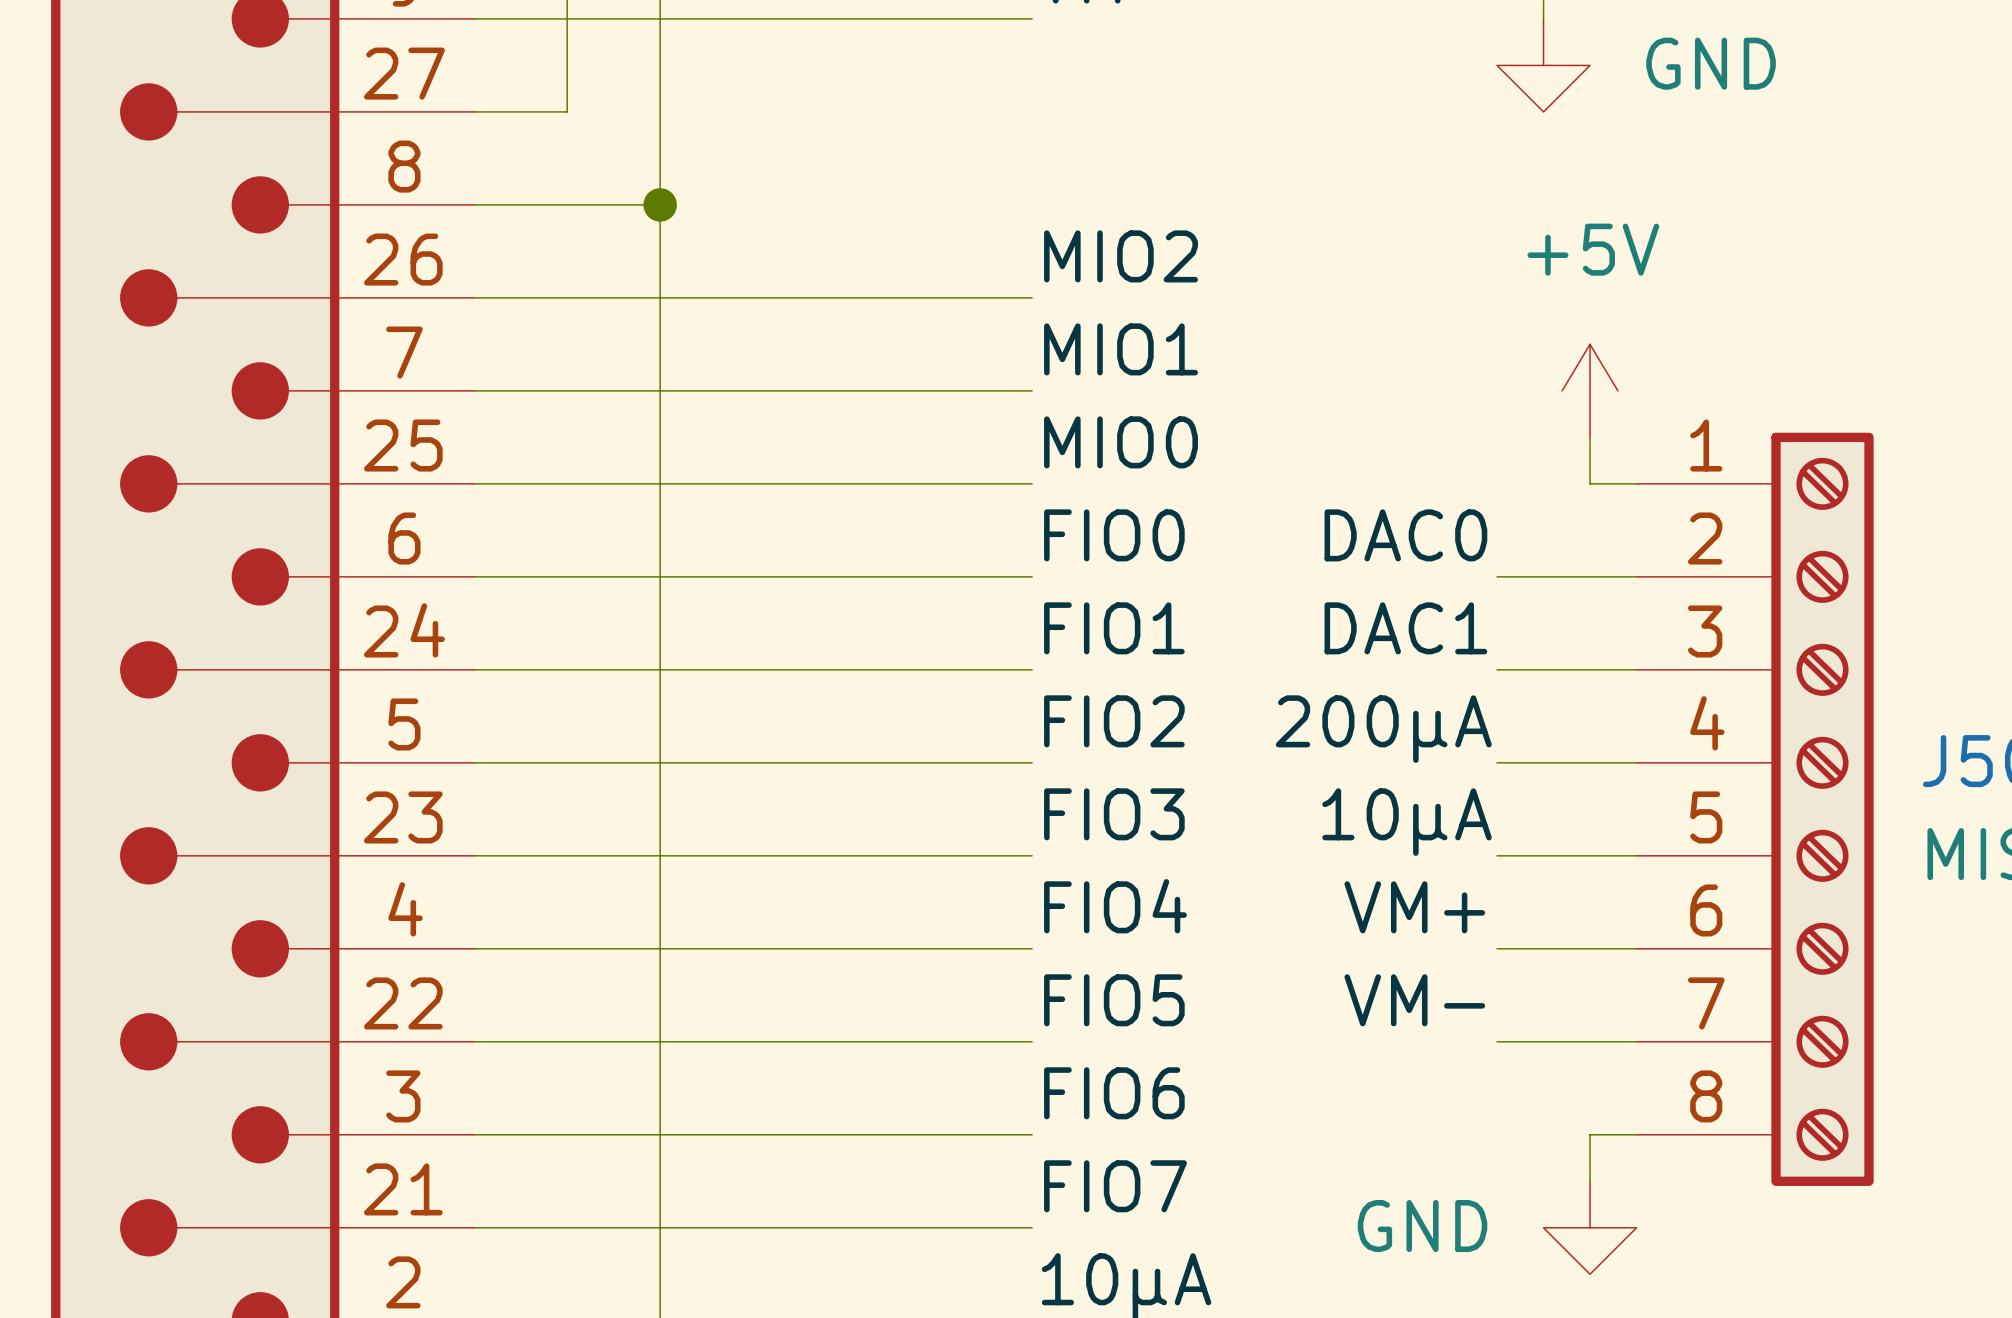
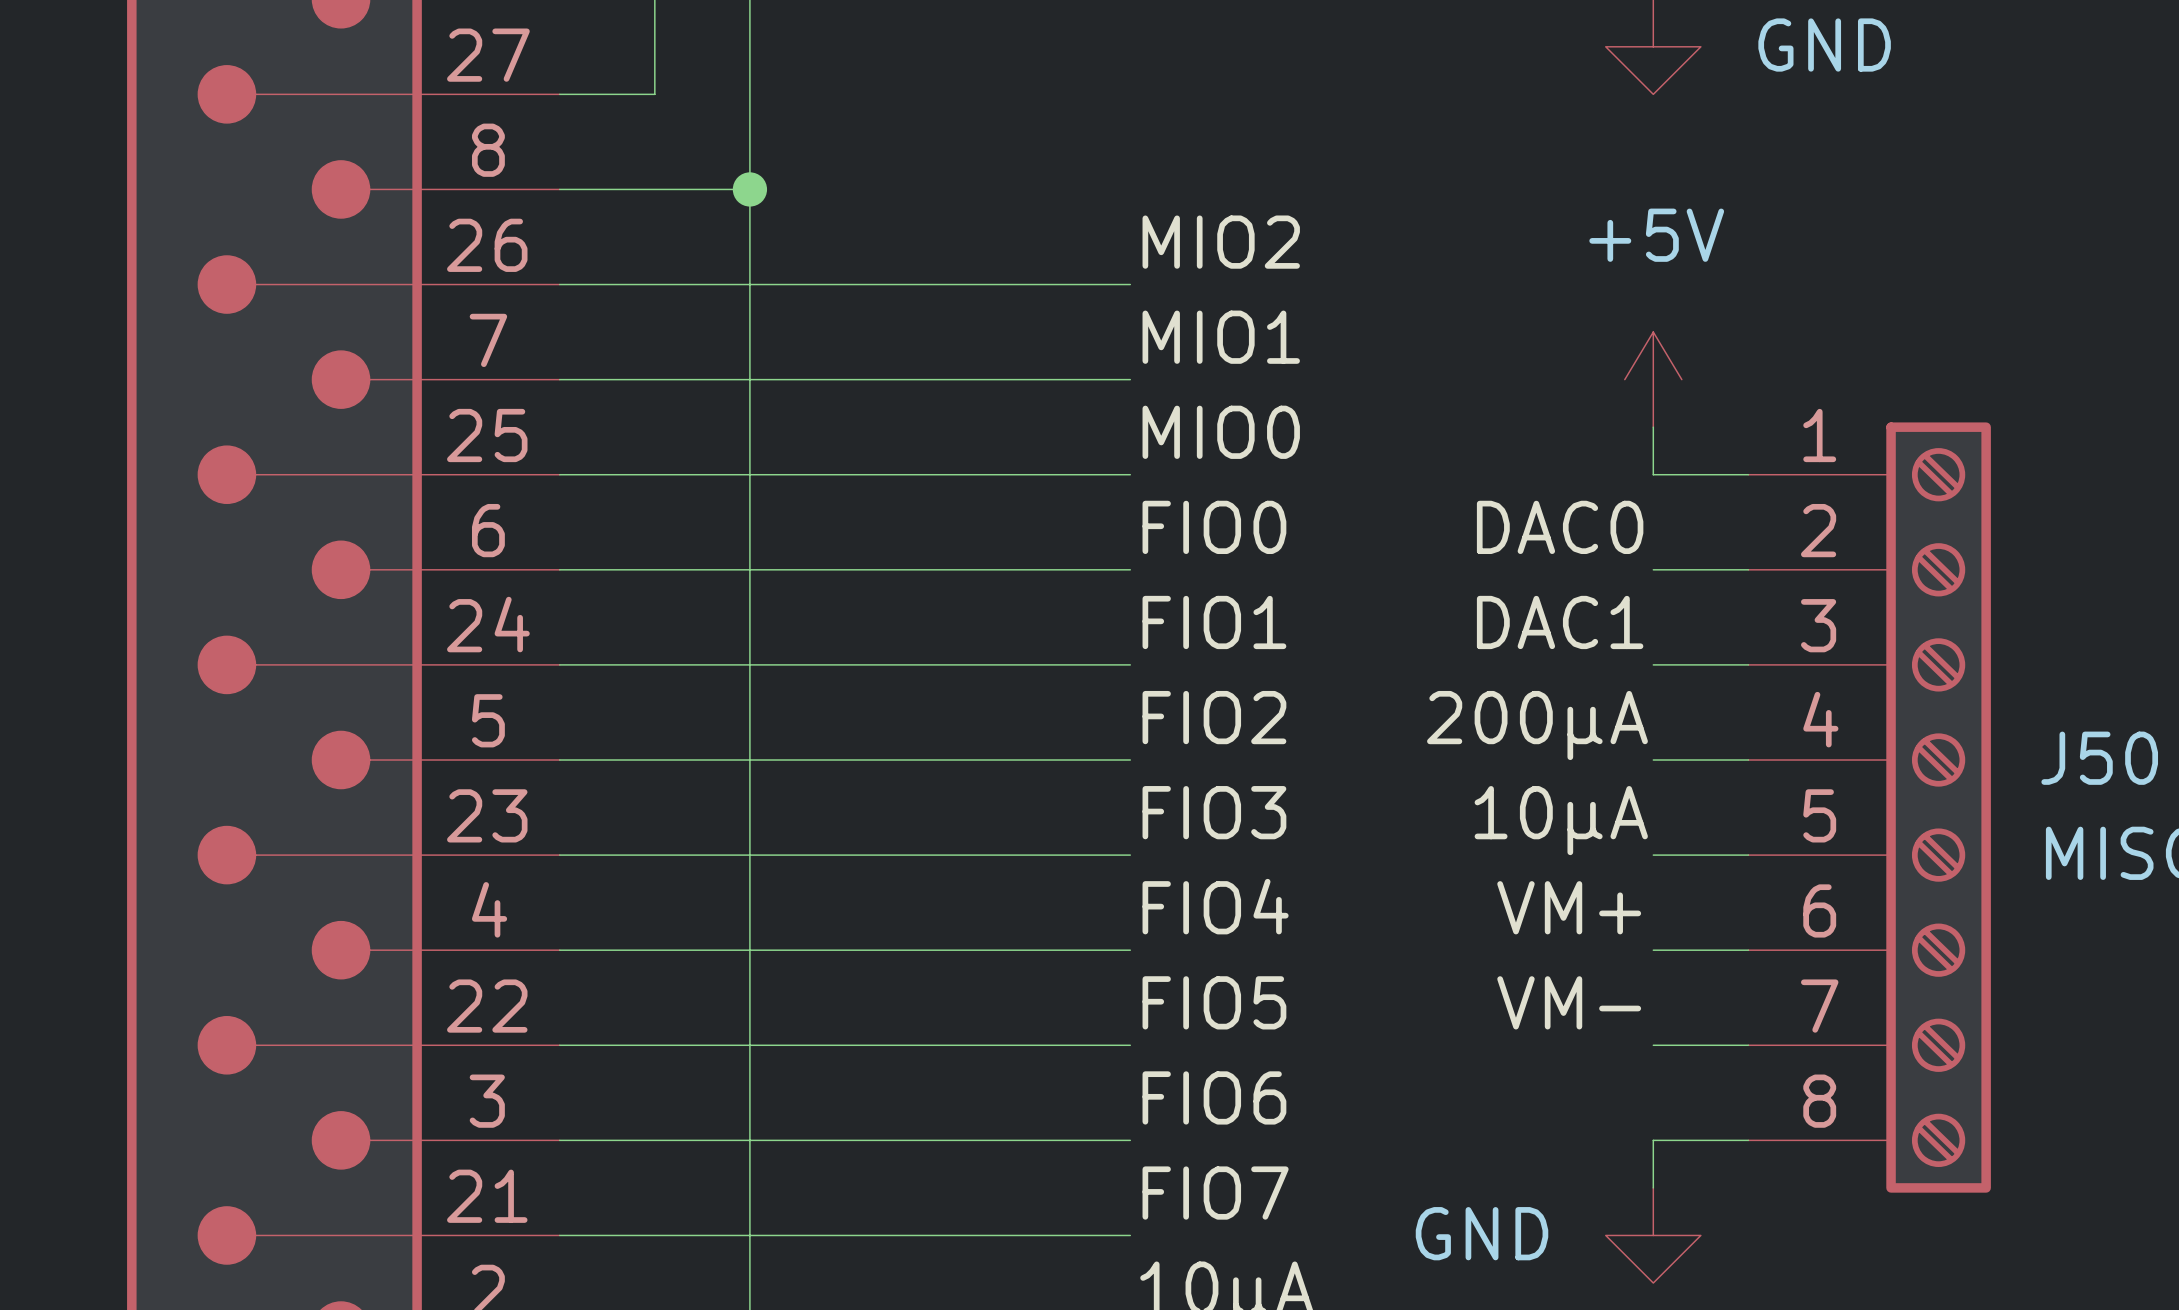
power symbol position: +5V (1590, 390) -> +5V (1653, 379)
wire: (1590, 437) (1590, 483) -> (1653, 427) (1653, 474) (1700, 474)
label position: DAC0 (1405, 535) -> DAC0 (1560, 527)
wire: (1497, 576) (1543, 576) -> none
label position: DAC1 (1405, 628) -> DAC1 (1560, 622)
wire: (1497, 669) (1543, 669) -> none
label position: 200µA (1383, 729) -> 200µA (1537, 725)
wire: (1497, 762) (1543, 762) -> none
label position: 10µA (1407, 822) -> 10µA (1561, 820)
wire: (1497, 855) (1543, 855) -> none
label position: VM+ (1414, 907) -> VM+ (1569, 907)
wire: (1497, 948) (1543, 948) -> none
label position: VM- (1414, 1000) -> VM- (1569, 1002)
wire: (1497, 1041) (1543, 1041) -> none
wire: (1590, 1134) (1590, 1181) -> (1700, 1140) (1653, 1140) (1653, 1187)
power symbol position: GND (1590, 1227) -> GND (1653, 1235)

